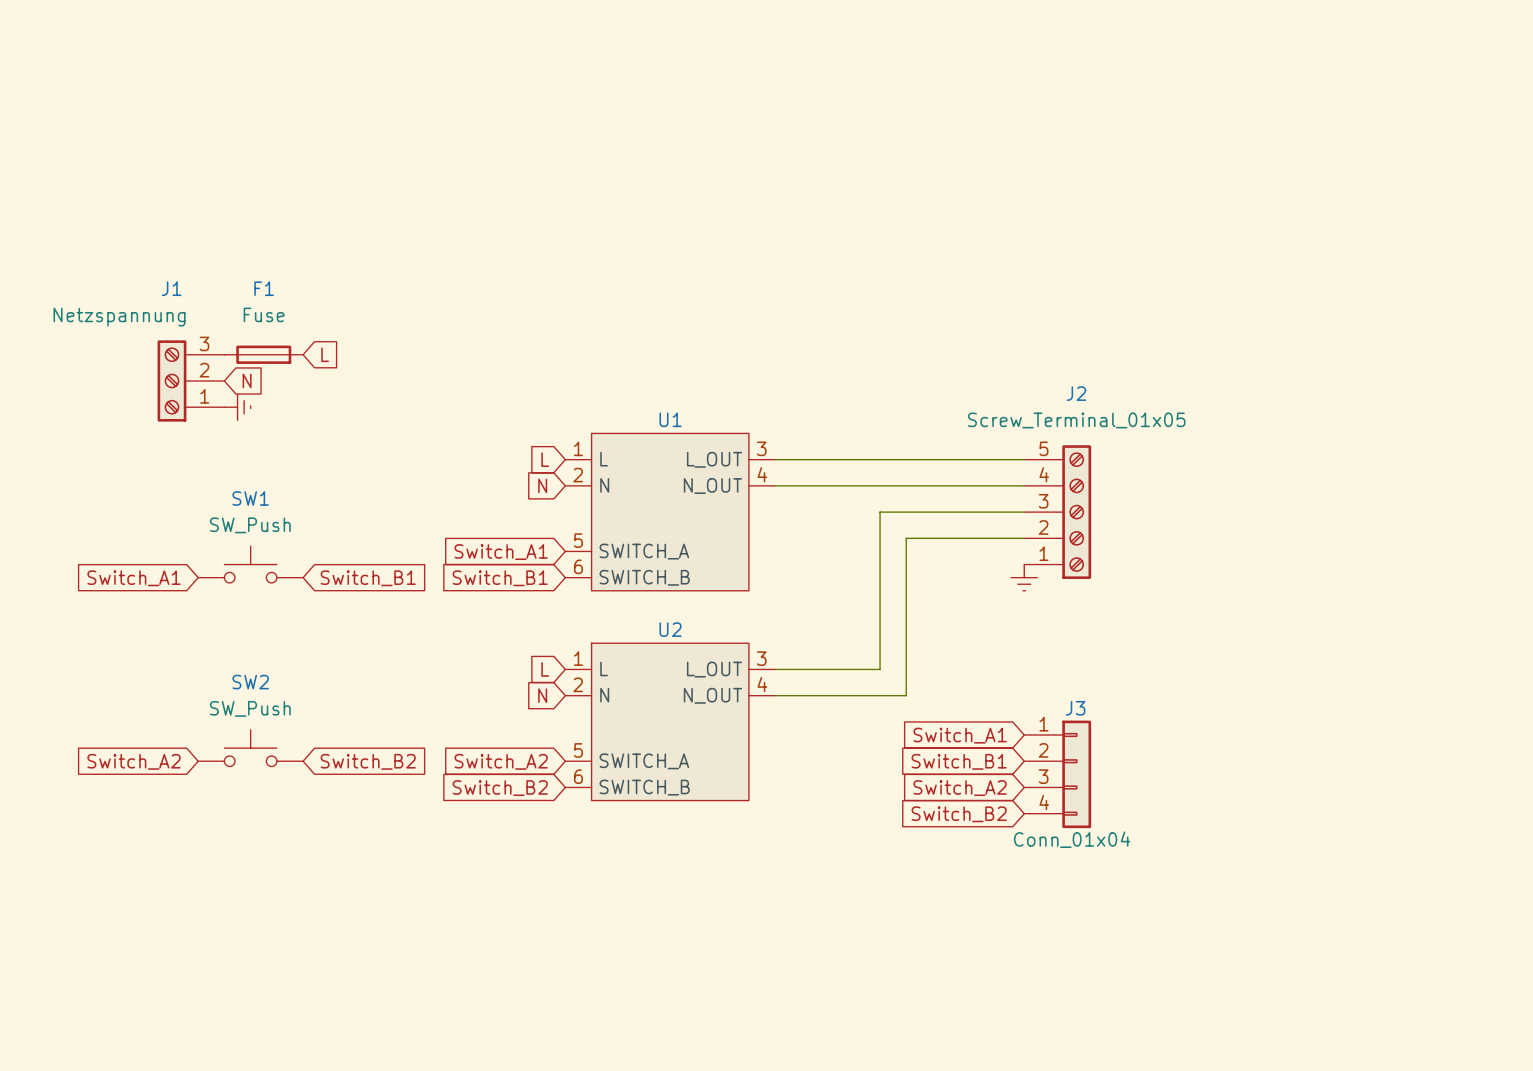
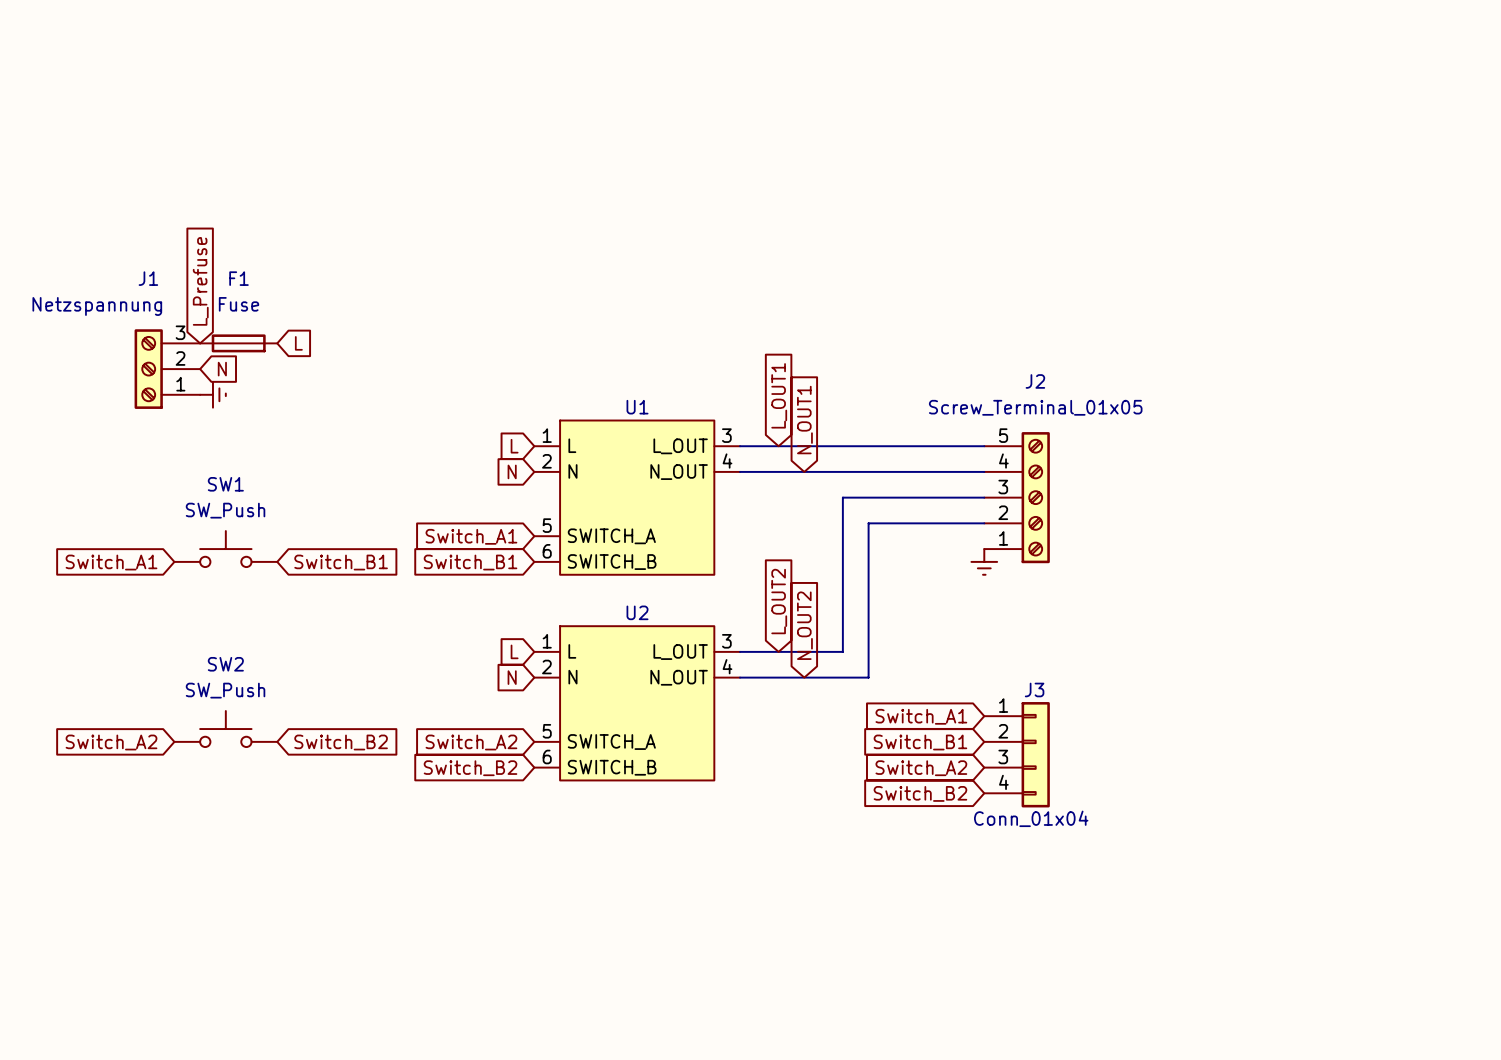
global label: none -> L_Prefuse (200, 281)
global label: none -> L_OUT1 (779, 395)
global label: none -> N_OUT1 (804, 420)
global label: none -> L_OUT2 (779, 601)
global label: none -> N_OUT2 (804, 625)

